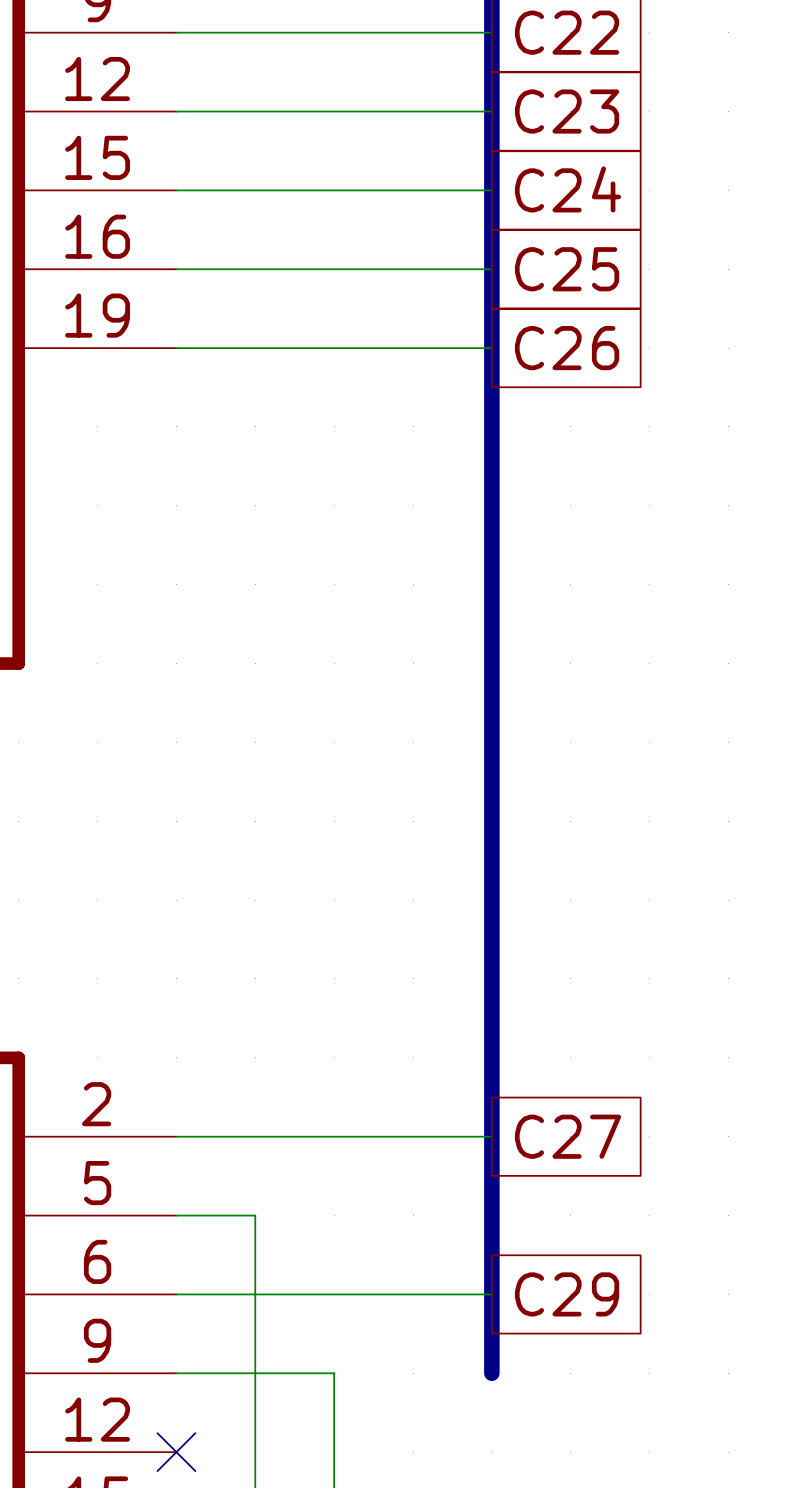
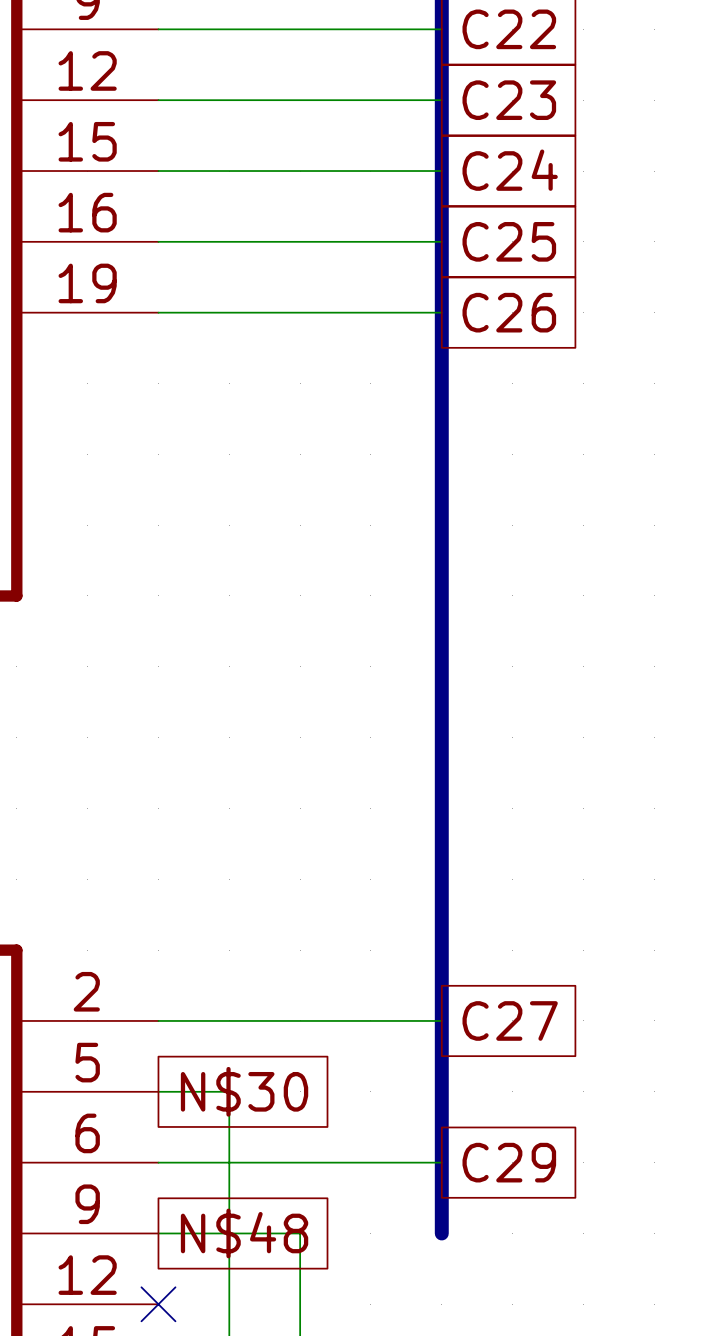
global label: none -> N$30 (244, 1091)
global label: none -> N$48 (244, 1233)

